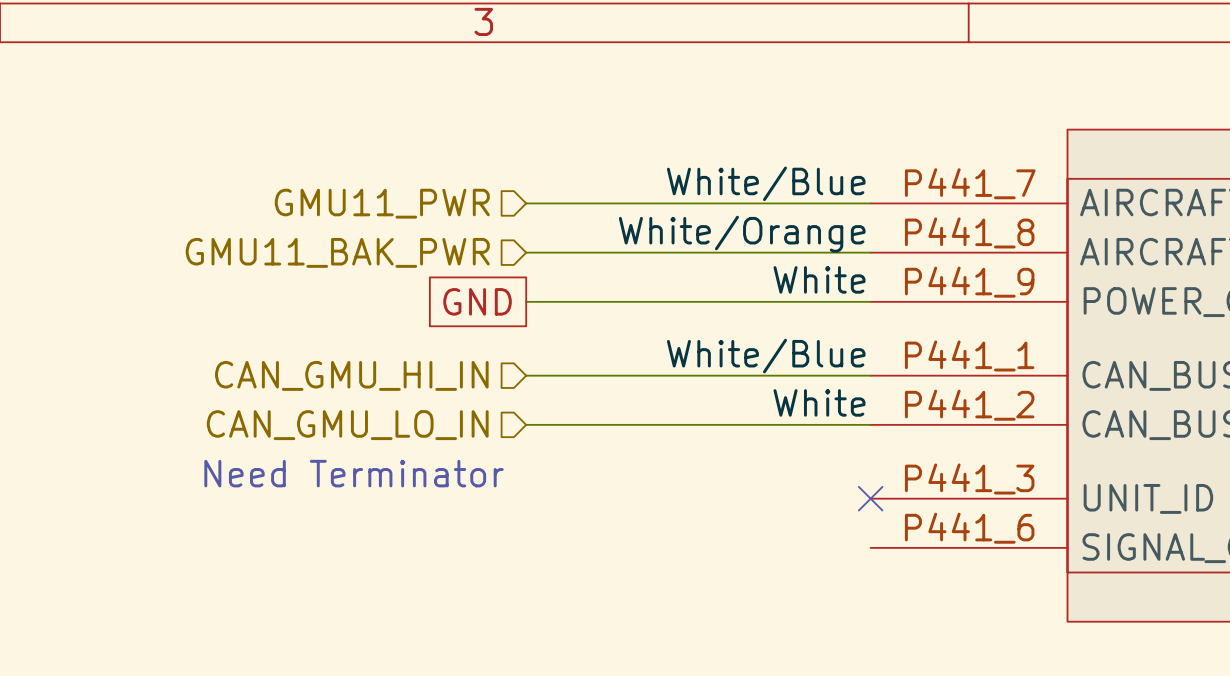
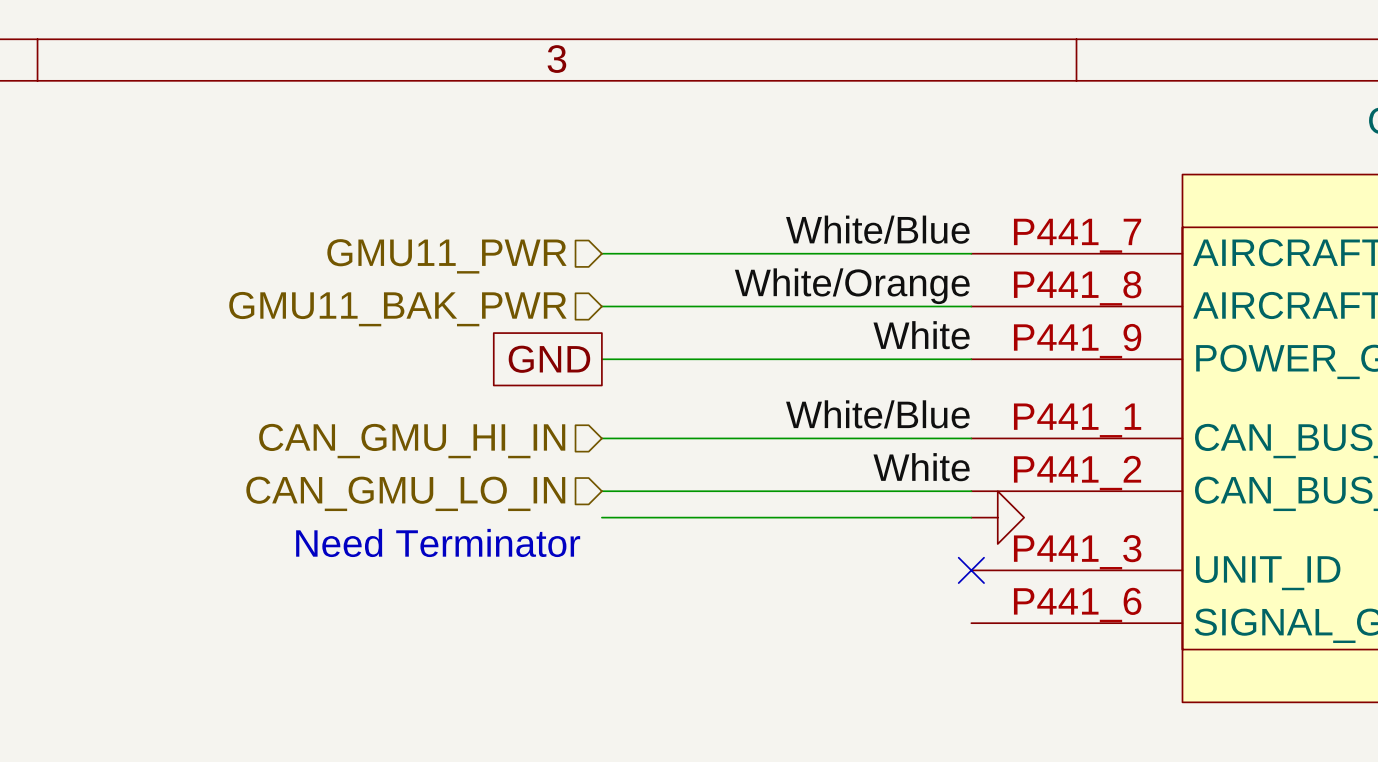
wire: none -> (601, 517) (971, 517)
power symbol: none -> (997, 517)

